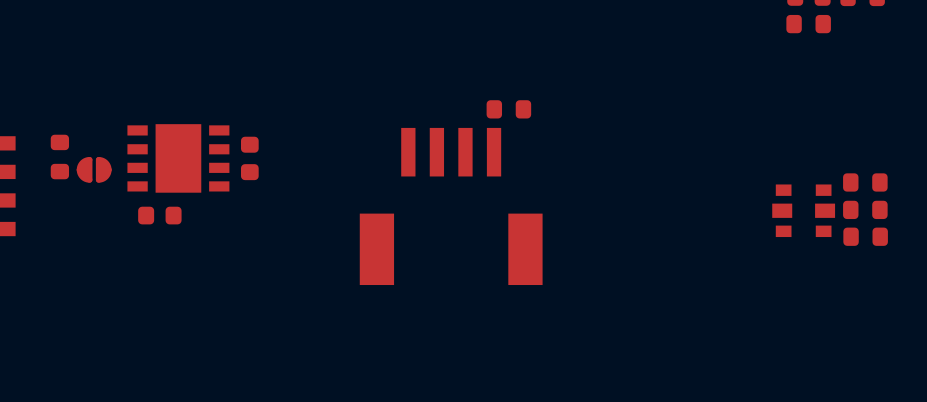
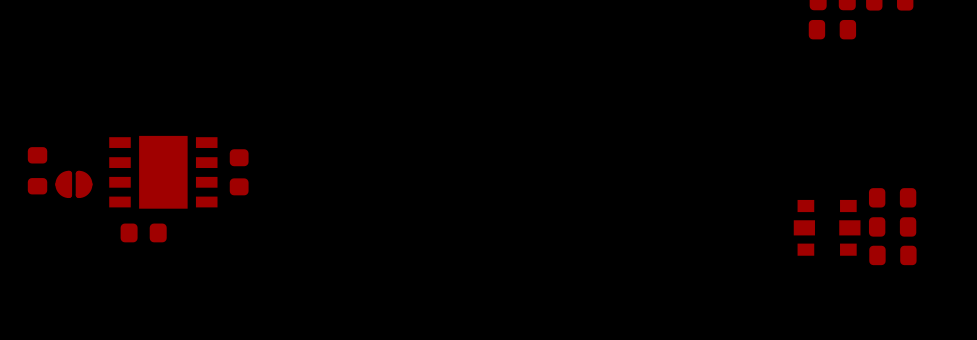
part: (508, 109) -> none
part: (451, 206) -> none

